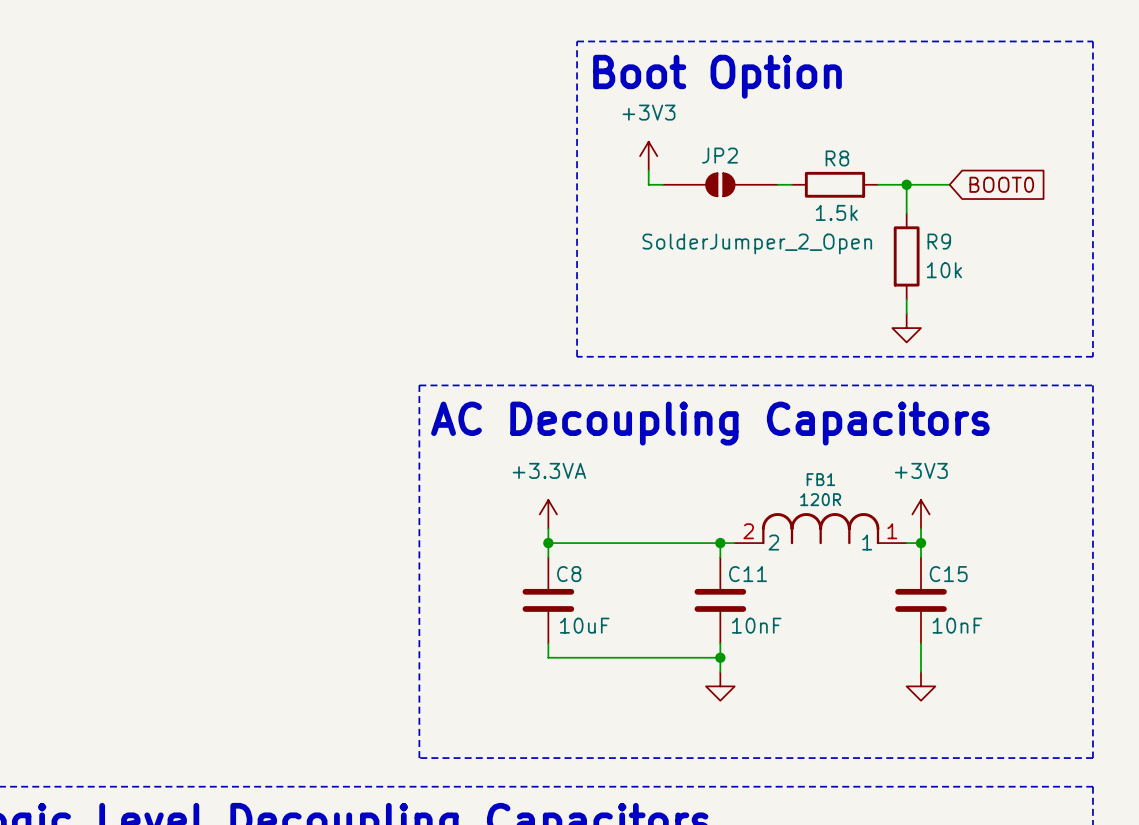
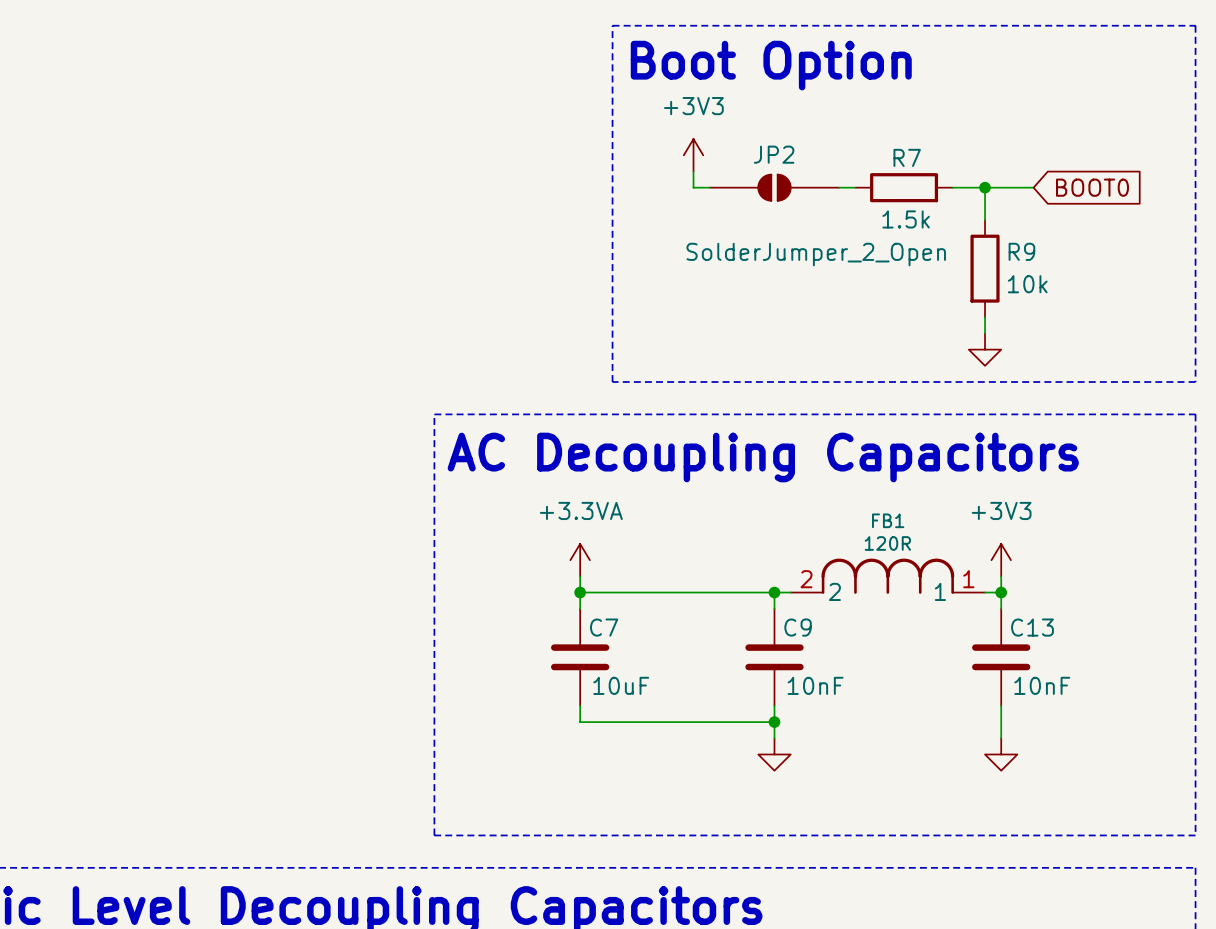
R8 name: R8 (837, 158) -> R7 (907, 157)
C8 name: C8 (569, 574) -> C7 (604, 627)
C11 name: C11 (748, 574) -> C9 (798, 627)
C15 name: C15 (948, 574) -> C13 (1032, 627)

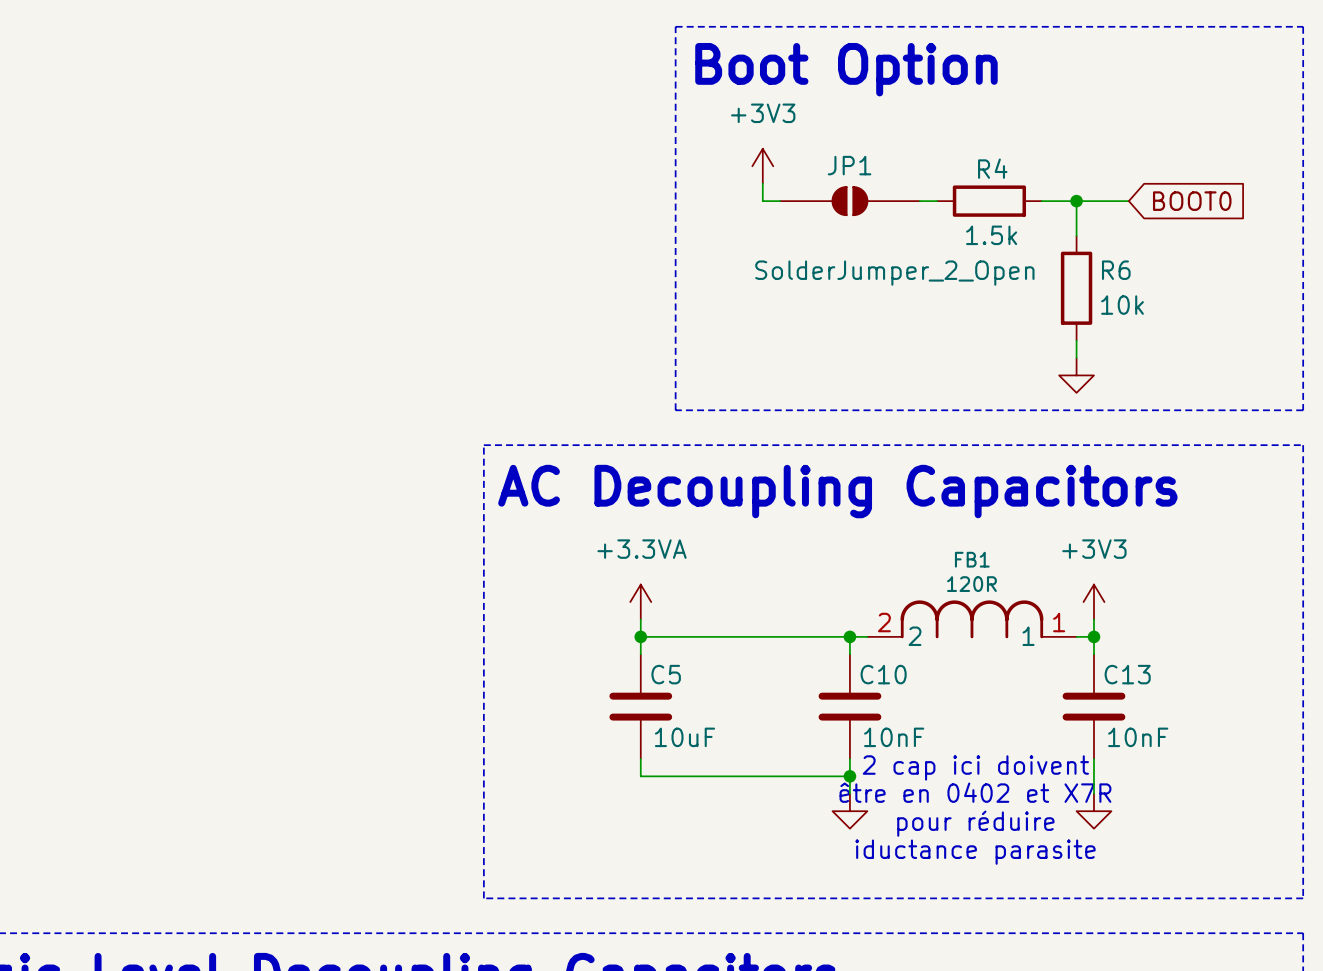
JP2 name: JP2 (774, 154) -> JP1 (849, 165)
R7 name: R7 (907, 157) -> R4 (992, 168)
R9 name: R9 (1021, 251) -> R6 (1116, 270)
C7 name: C7 (604, 627) -> C5 (666, 674)
C9 name: C9 (798, 627) -> C10 (883, 674)
text: none -> 2 cap ici doivent (975, 767)
text: none -> être en 0402 et X7R (975, 792)
text: none -> pour réduire (975, 823)
text: none -> iductance parasite (975, 852)

